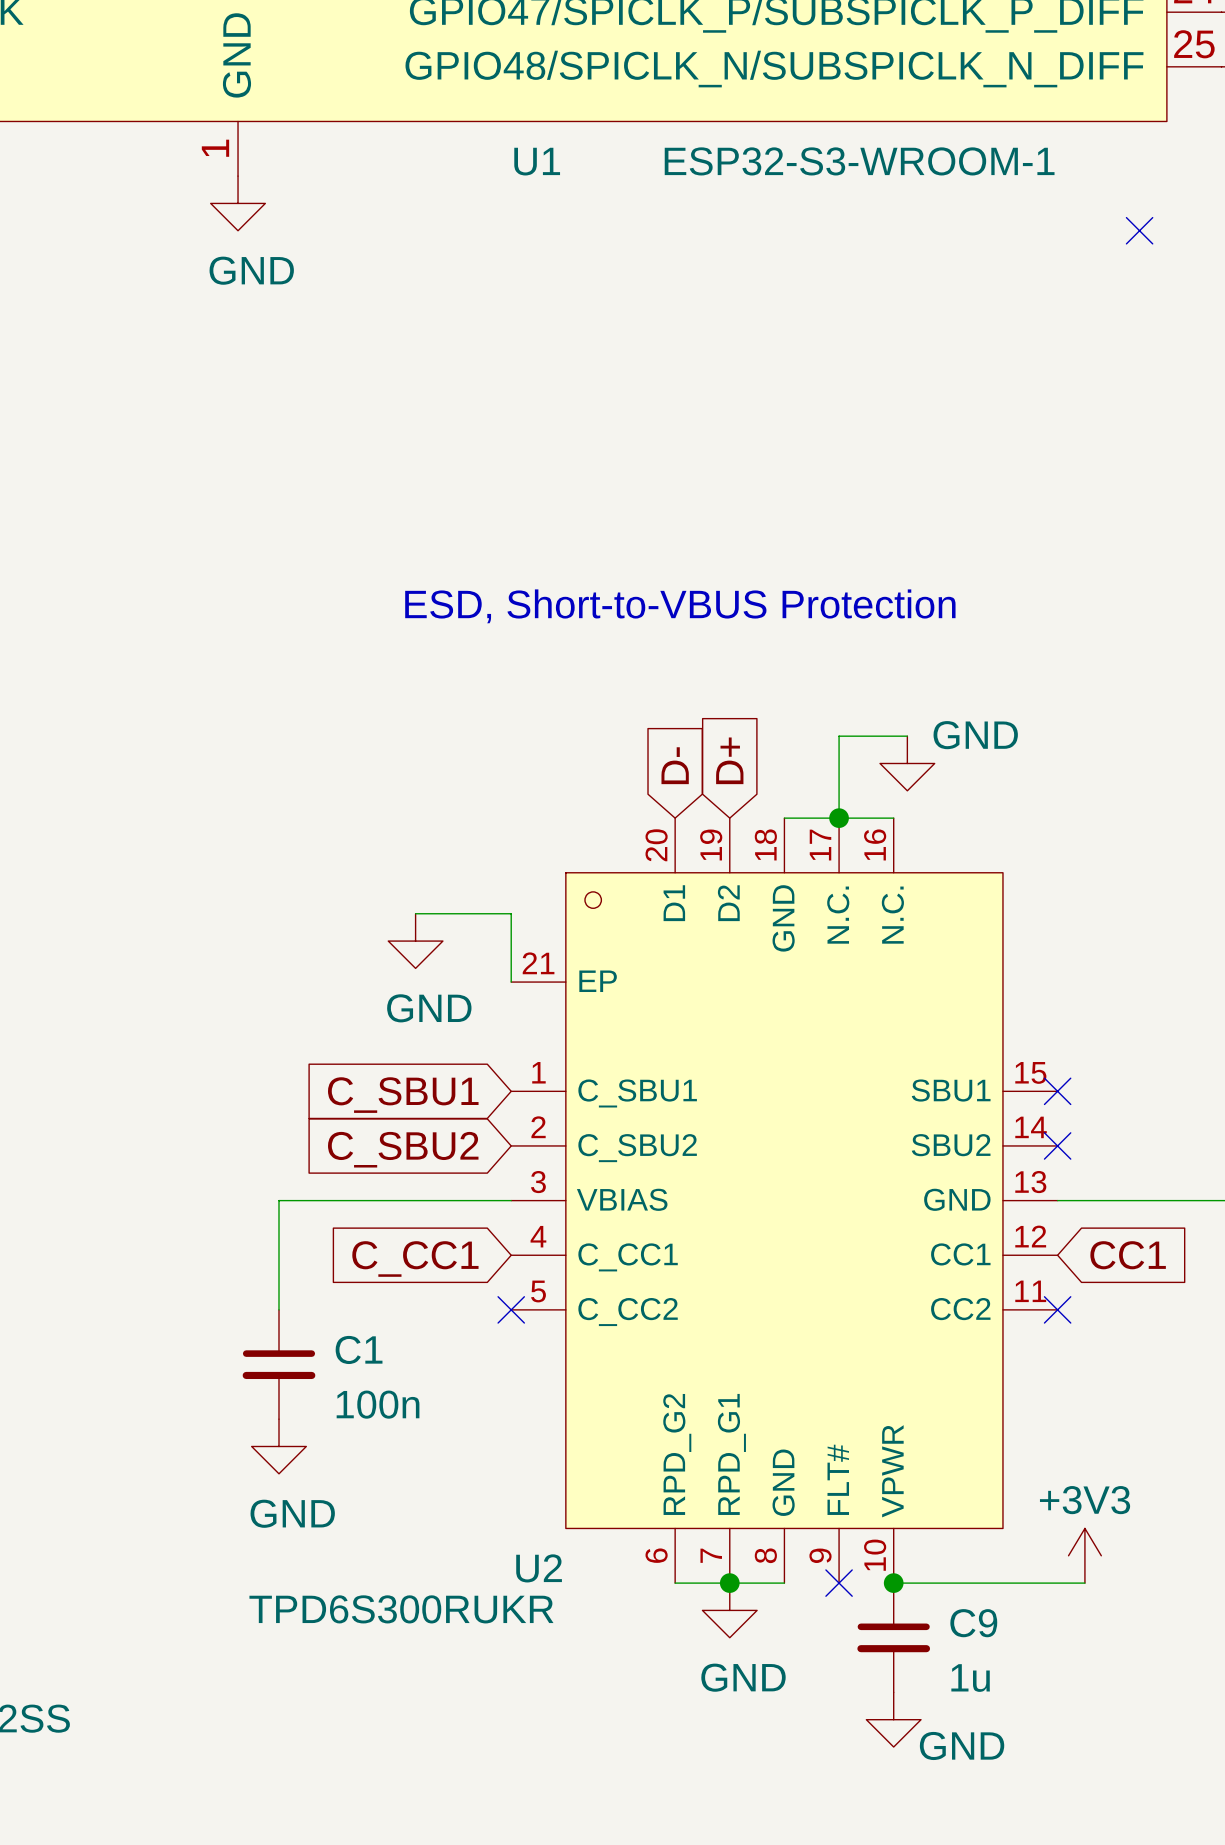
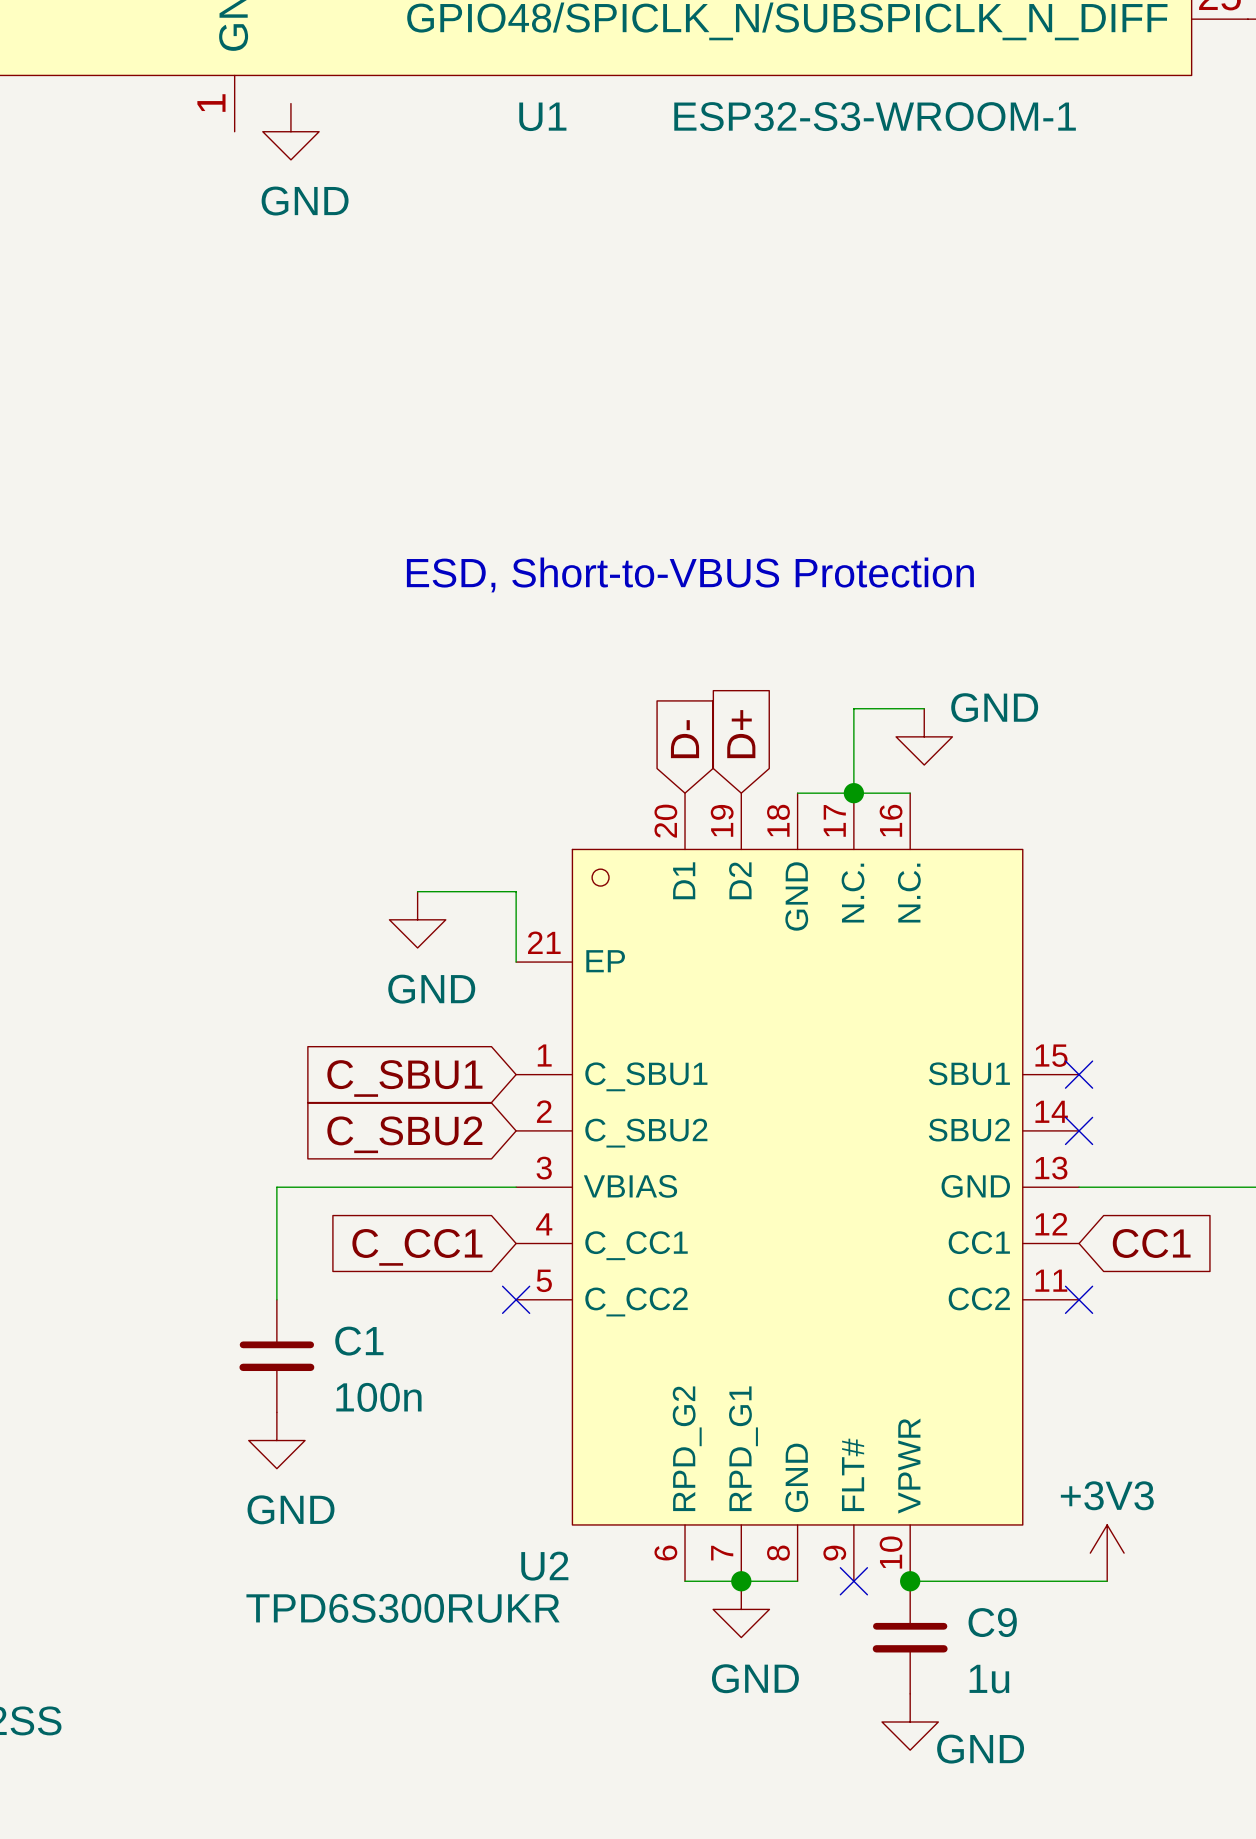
power symbol position: GND (238, 203) -> GND (290, 131)
no-connect mark: (1139, 230) -> none

